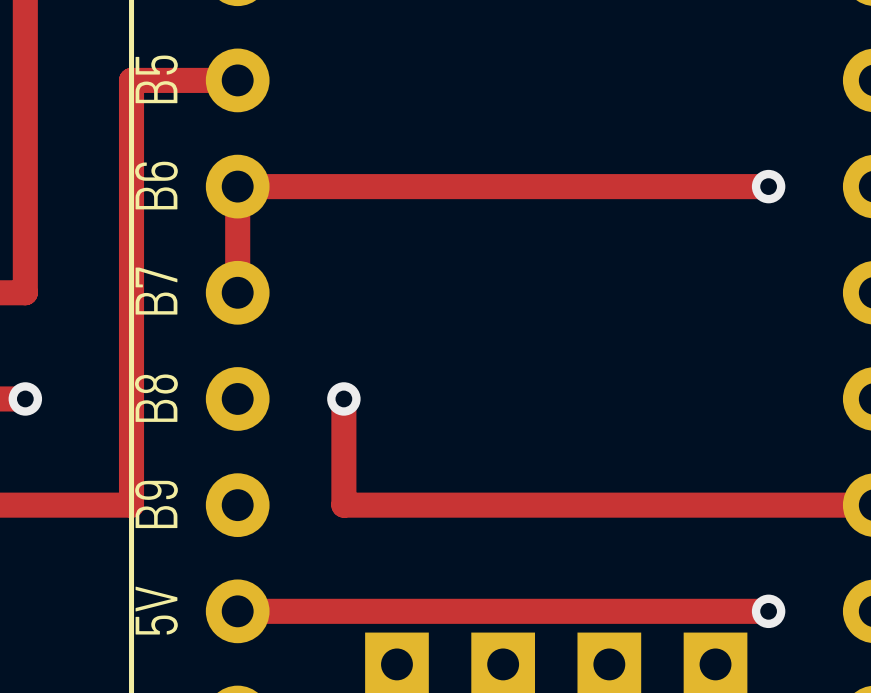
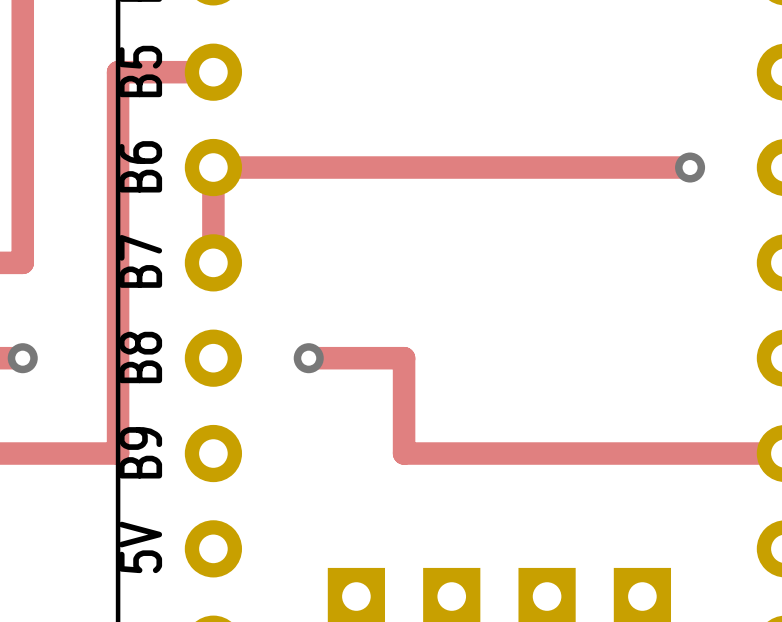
track: (343, 398) (343, 505) (450, 505) -> (308, 358) (404, 358) (404, 453)
track: (237, 611) (768, 611) -> none
via: (768, 611) -> none

